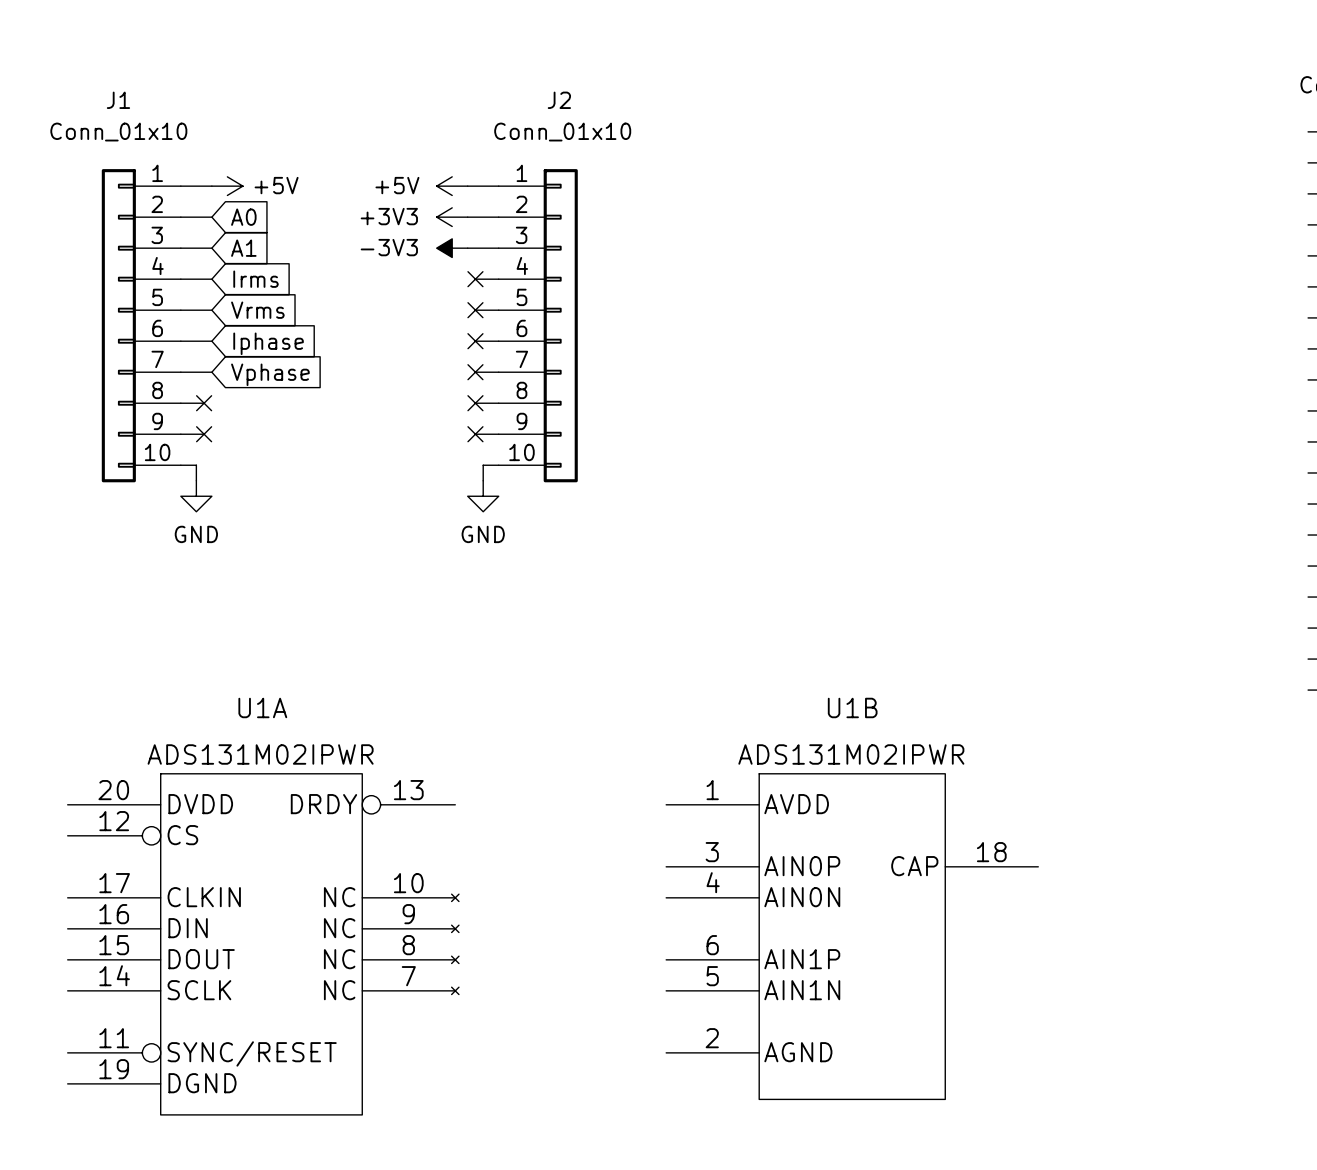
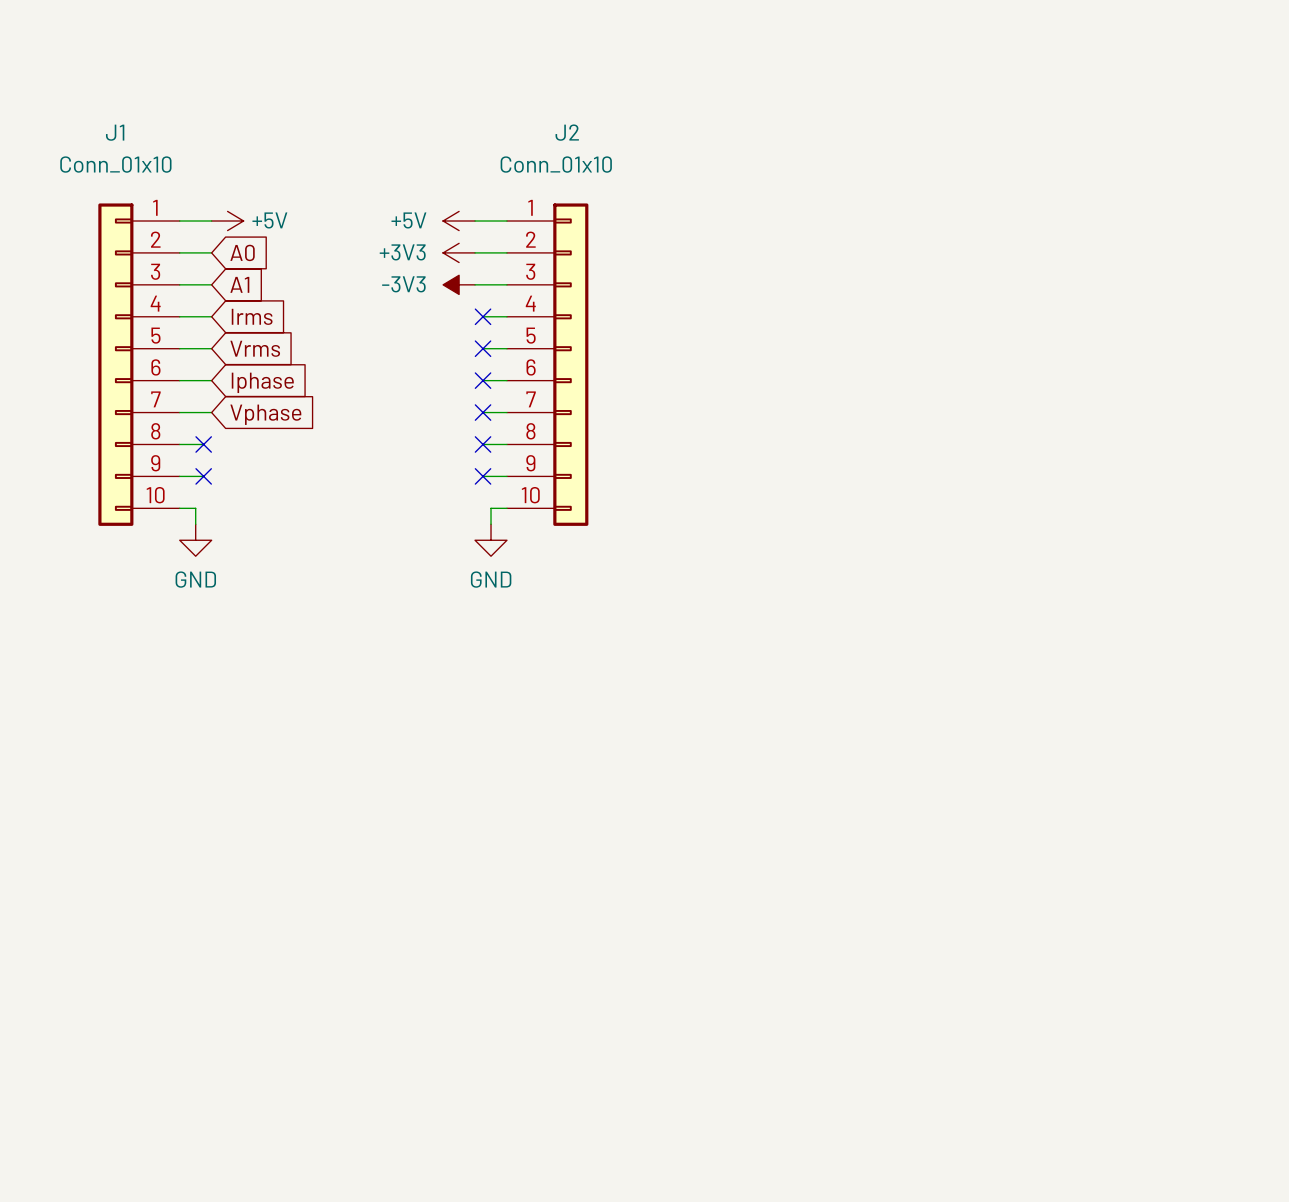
U1B: ADS131M02IPWR (852, 936) -> none
U1A: ADS131M02IPWR (263, 944) -> none

